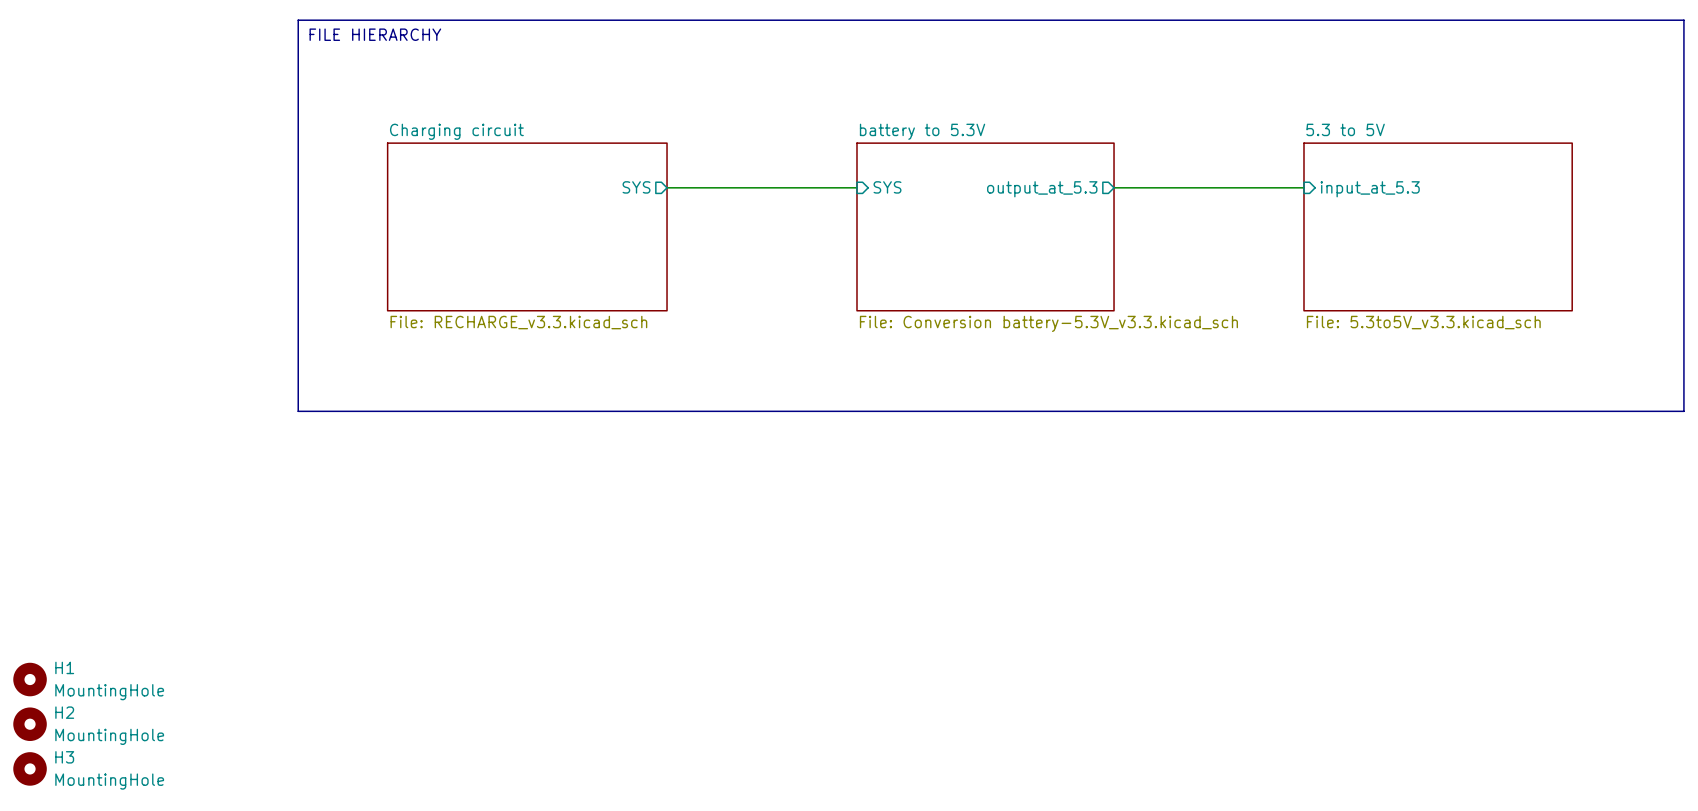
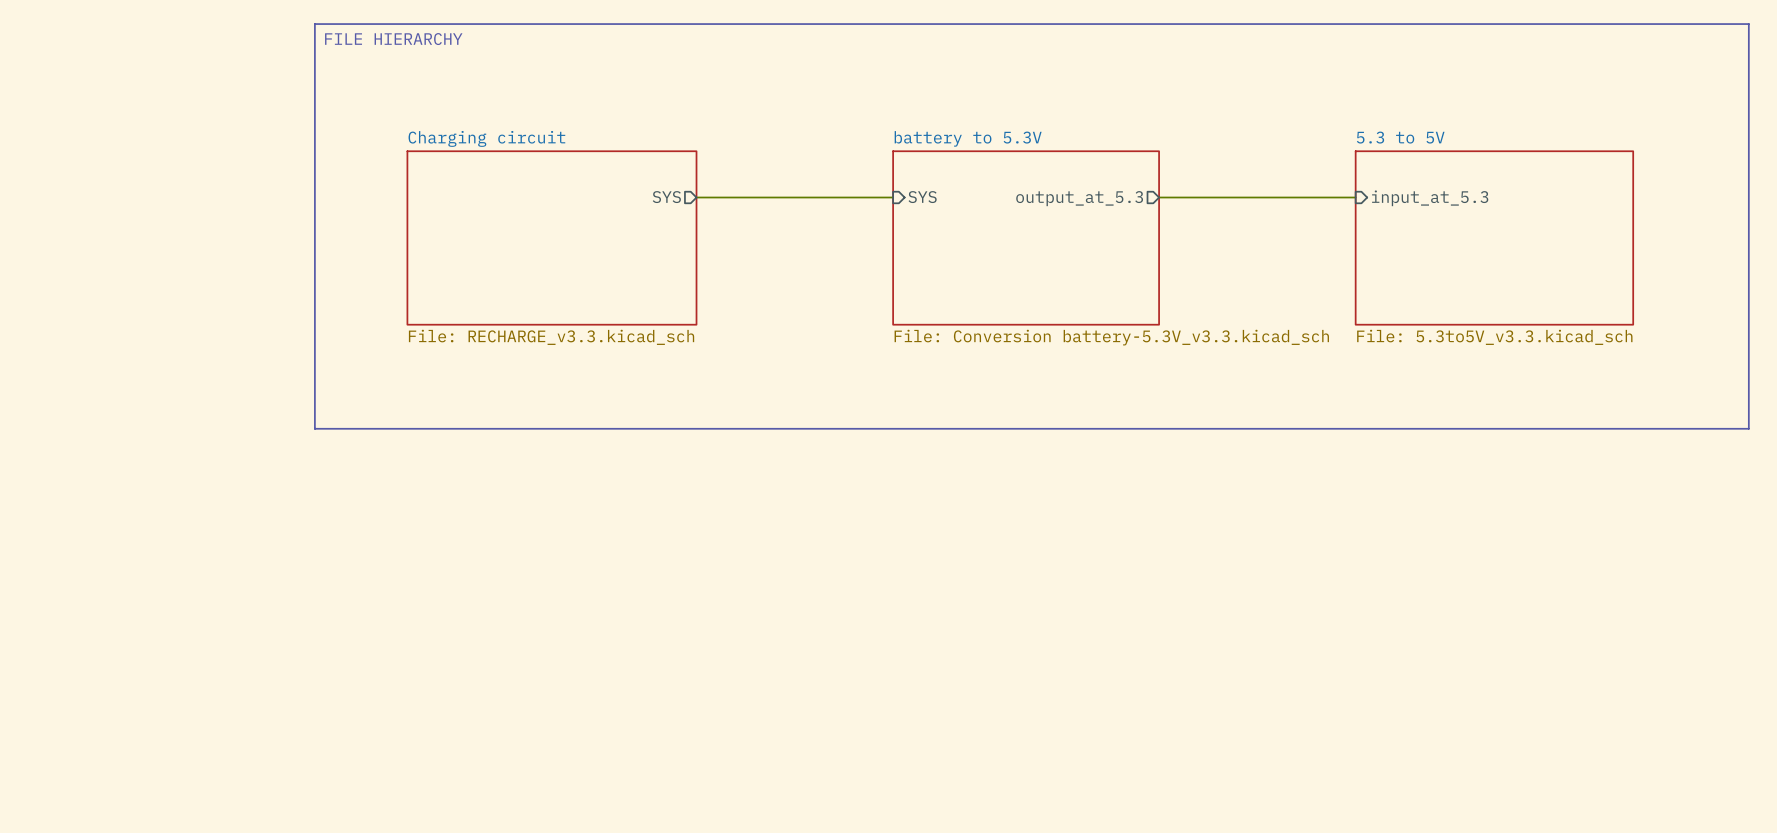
H1: MountingHole (30, 679) -> none
H2: MountingHole (30, 724) -> none
H3: MountingHole (30, 768) -> none

